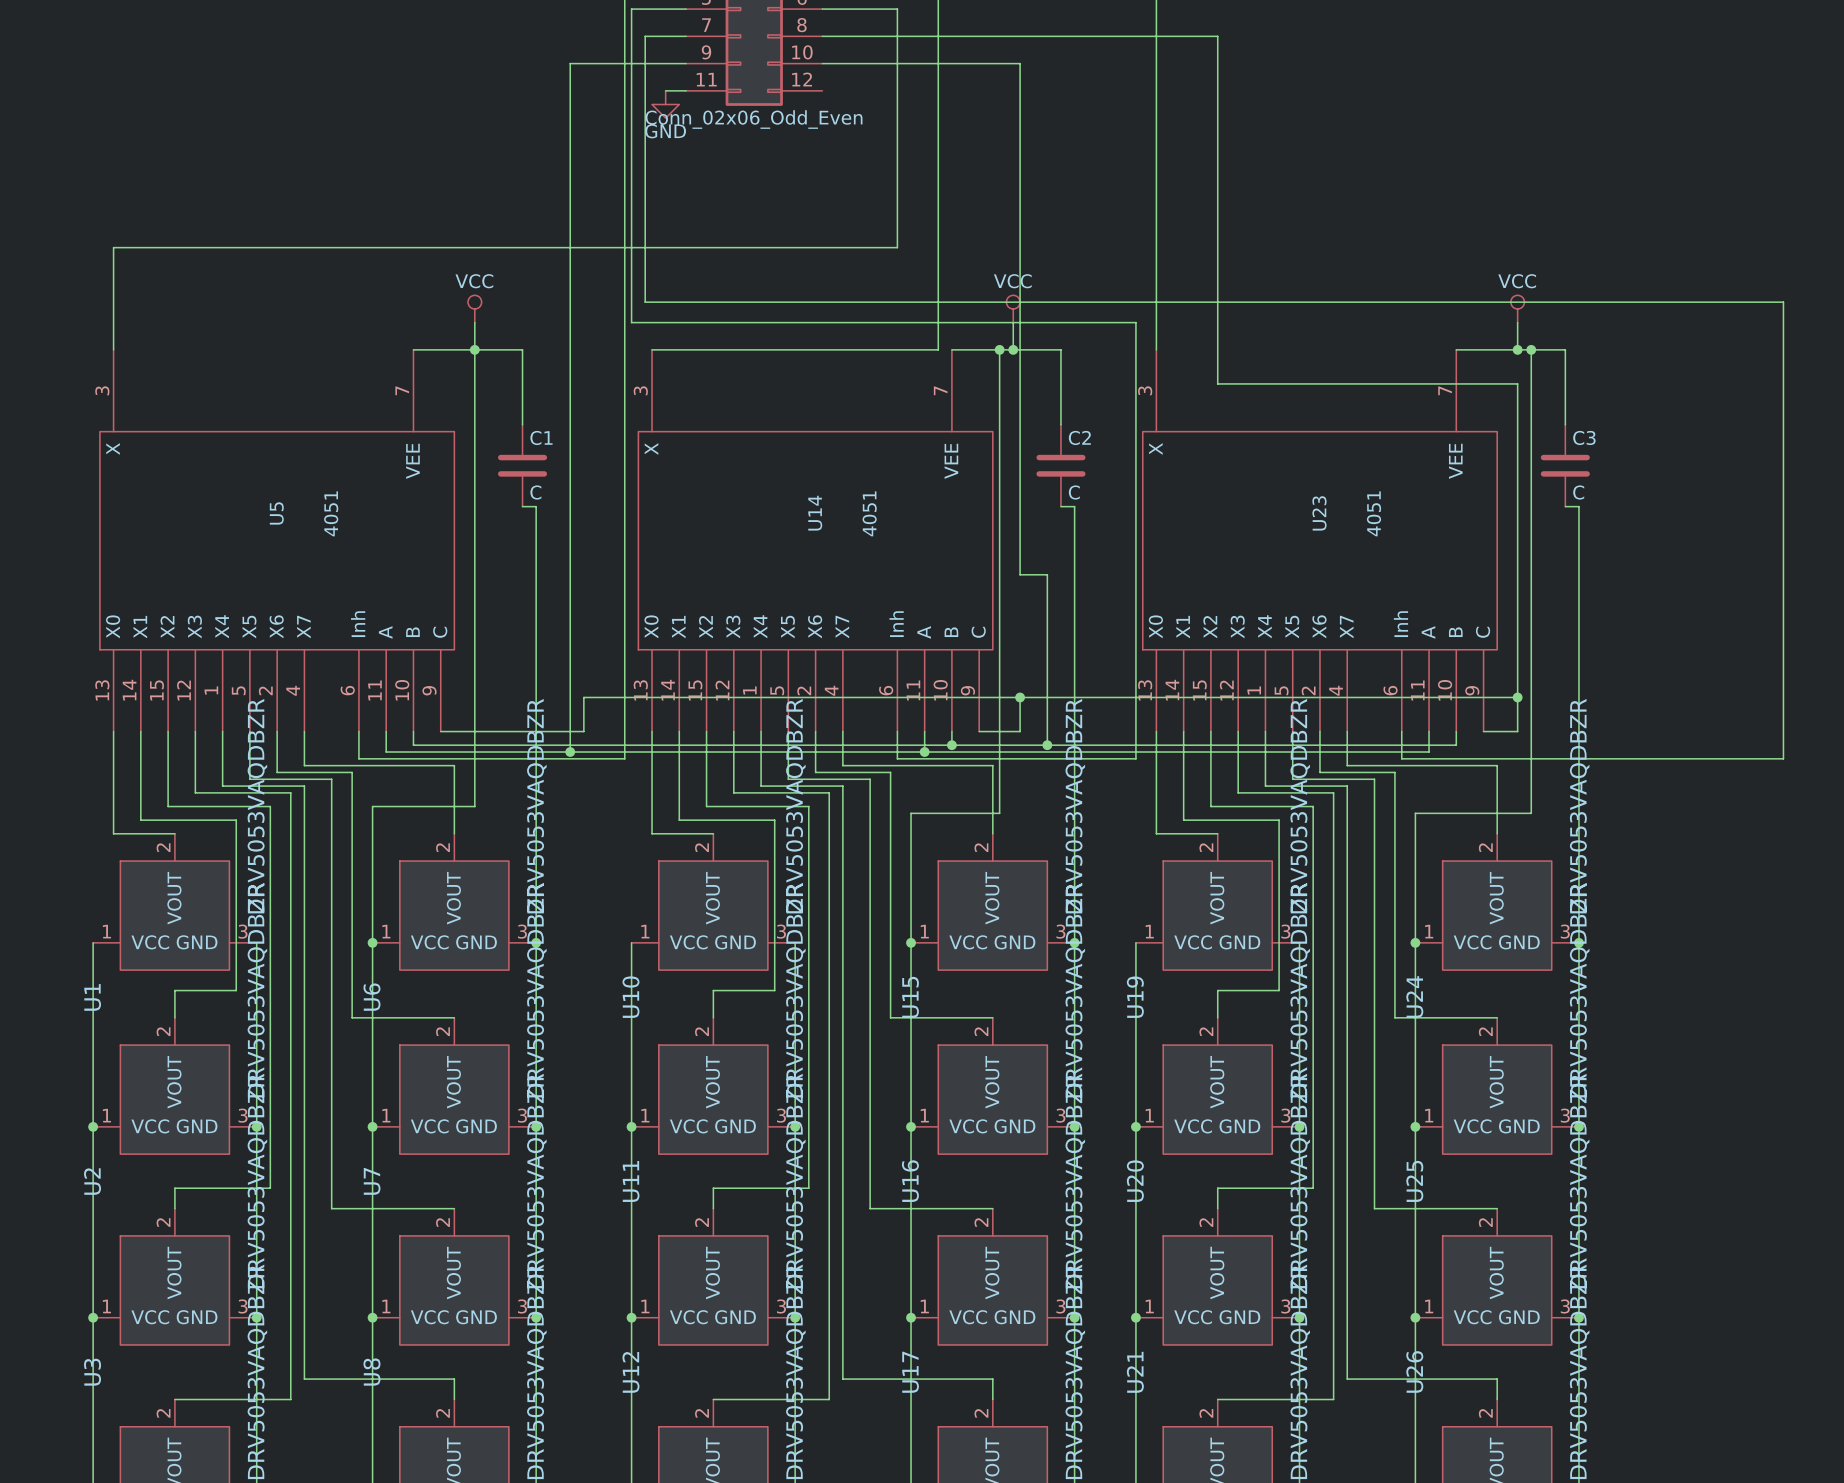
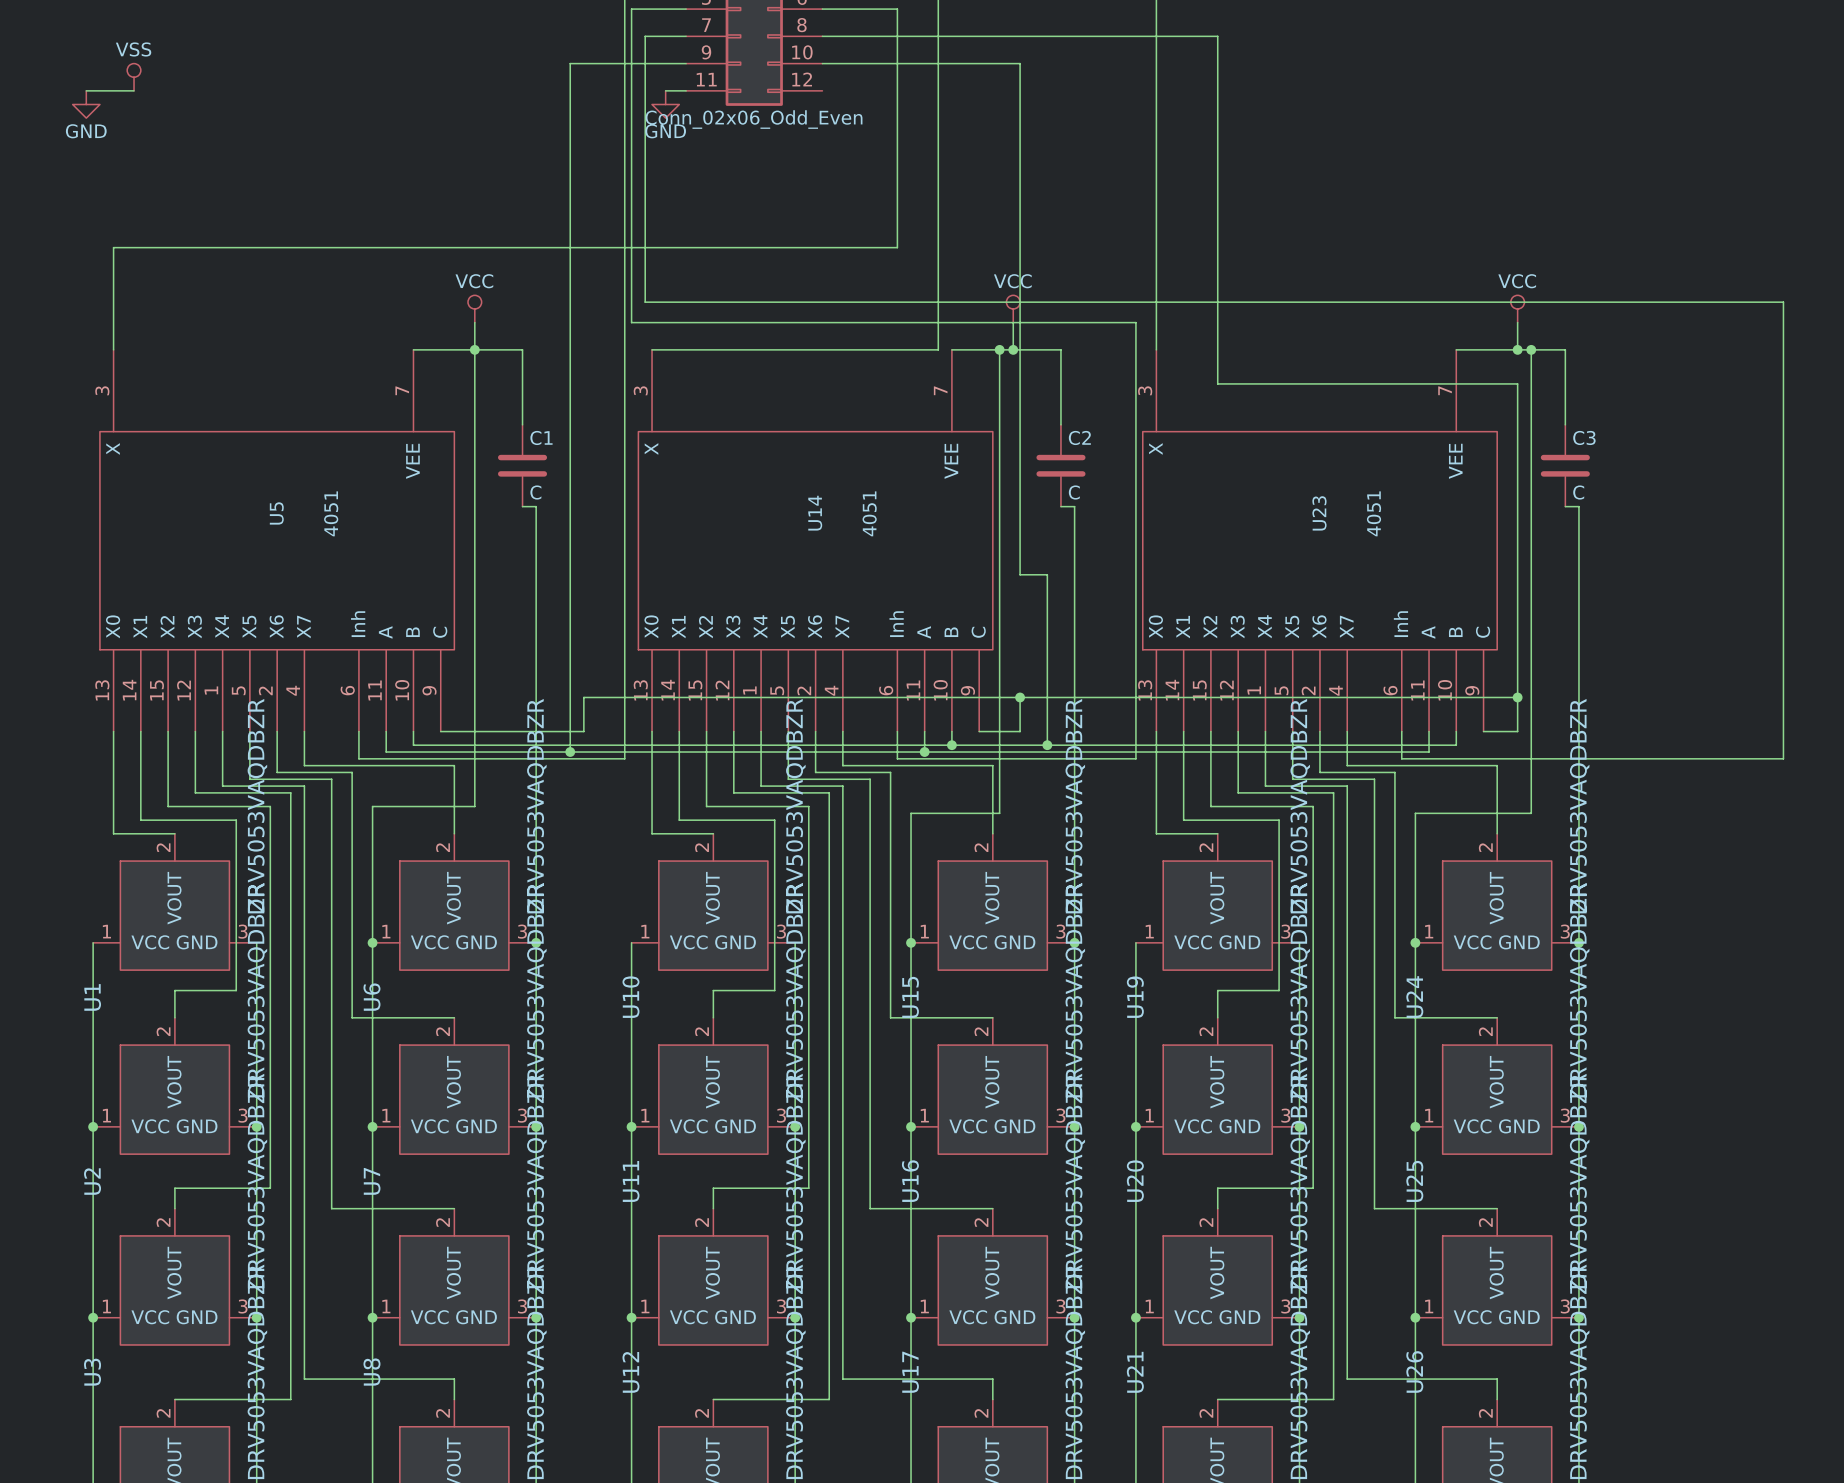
power symbol: none -> VSS (134, 77)
wire: none -> (86, 90) (134, 90)
power symbol: none -> GND (86, 104)

